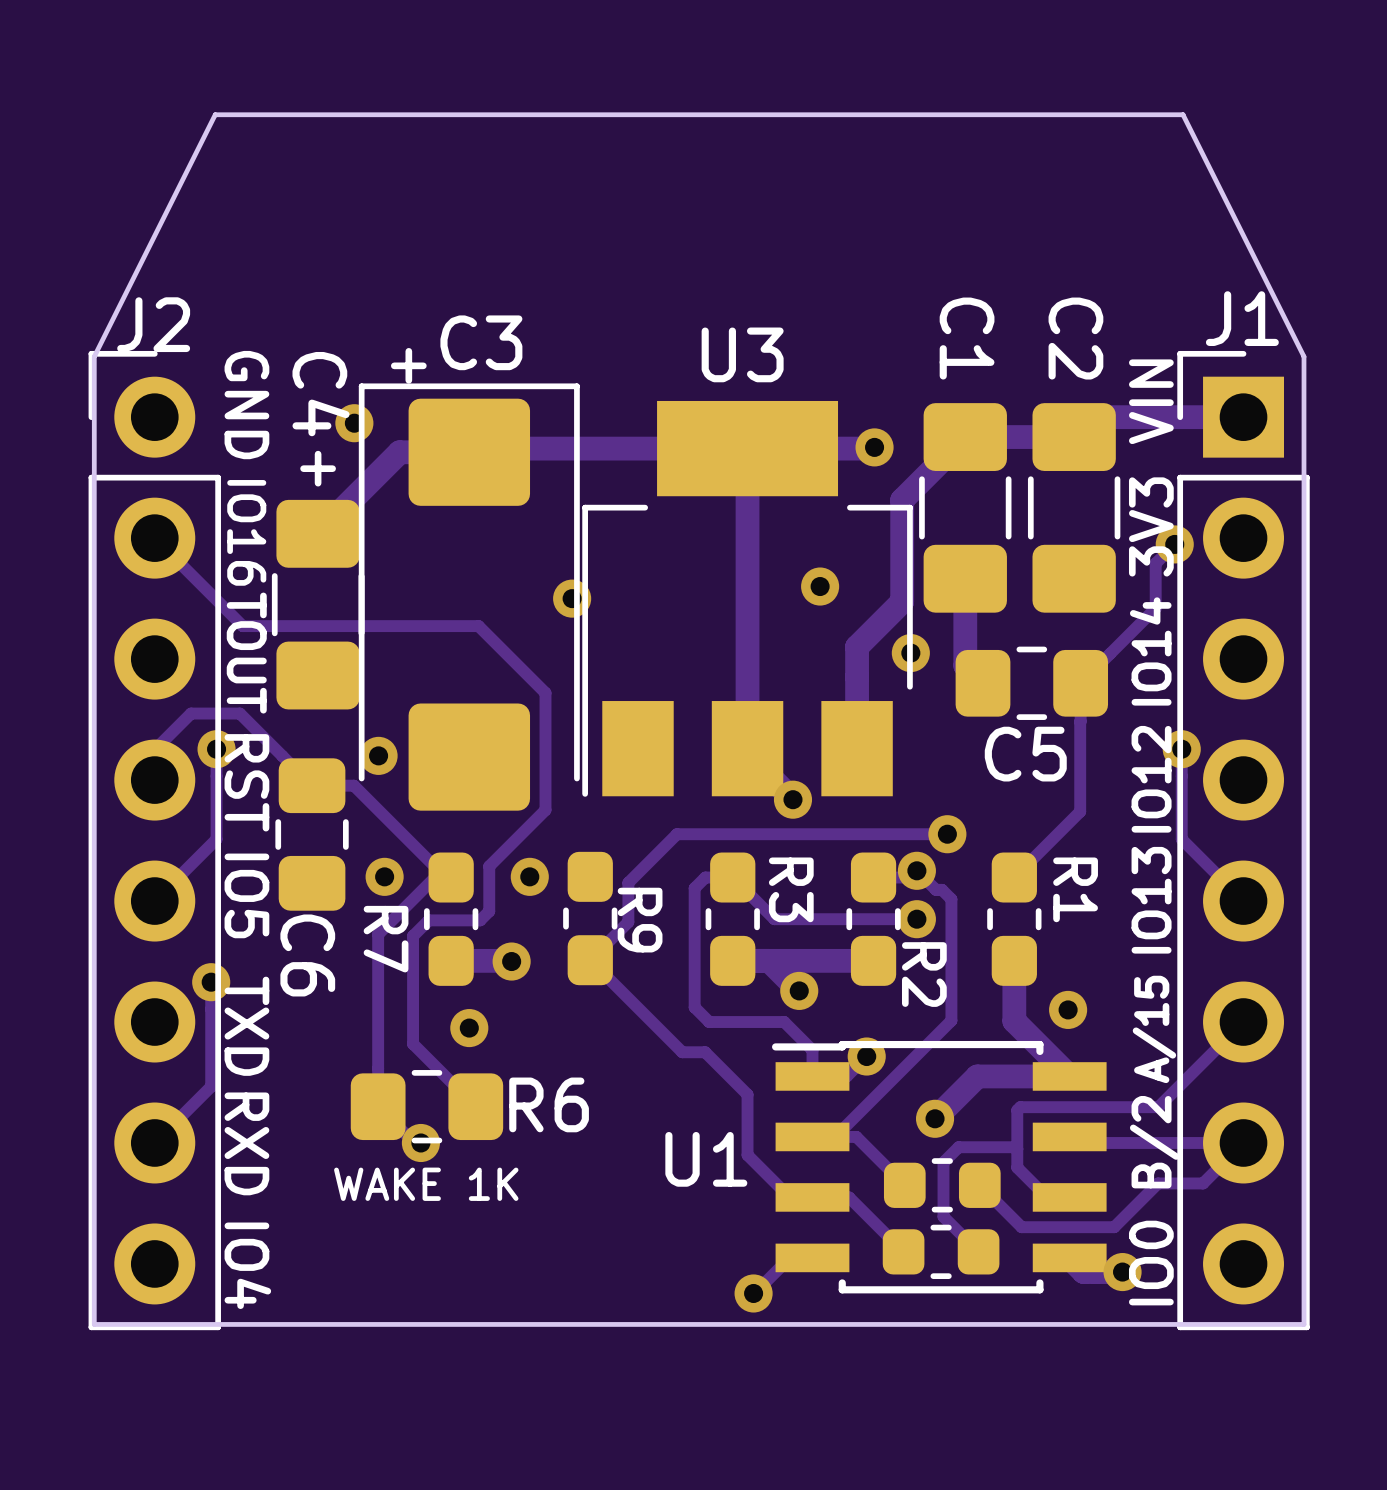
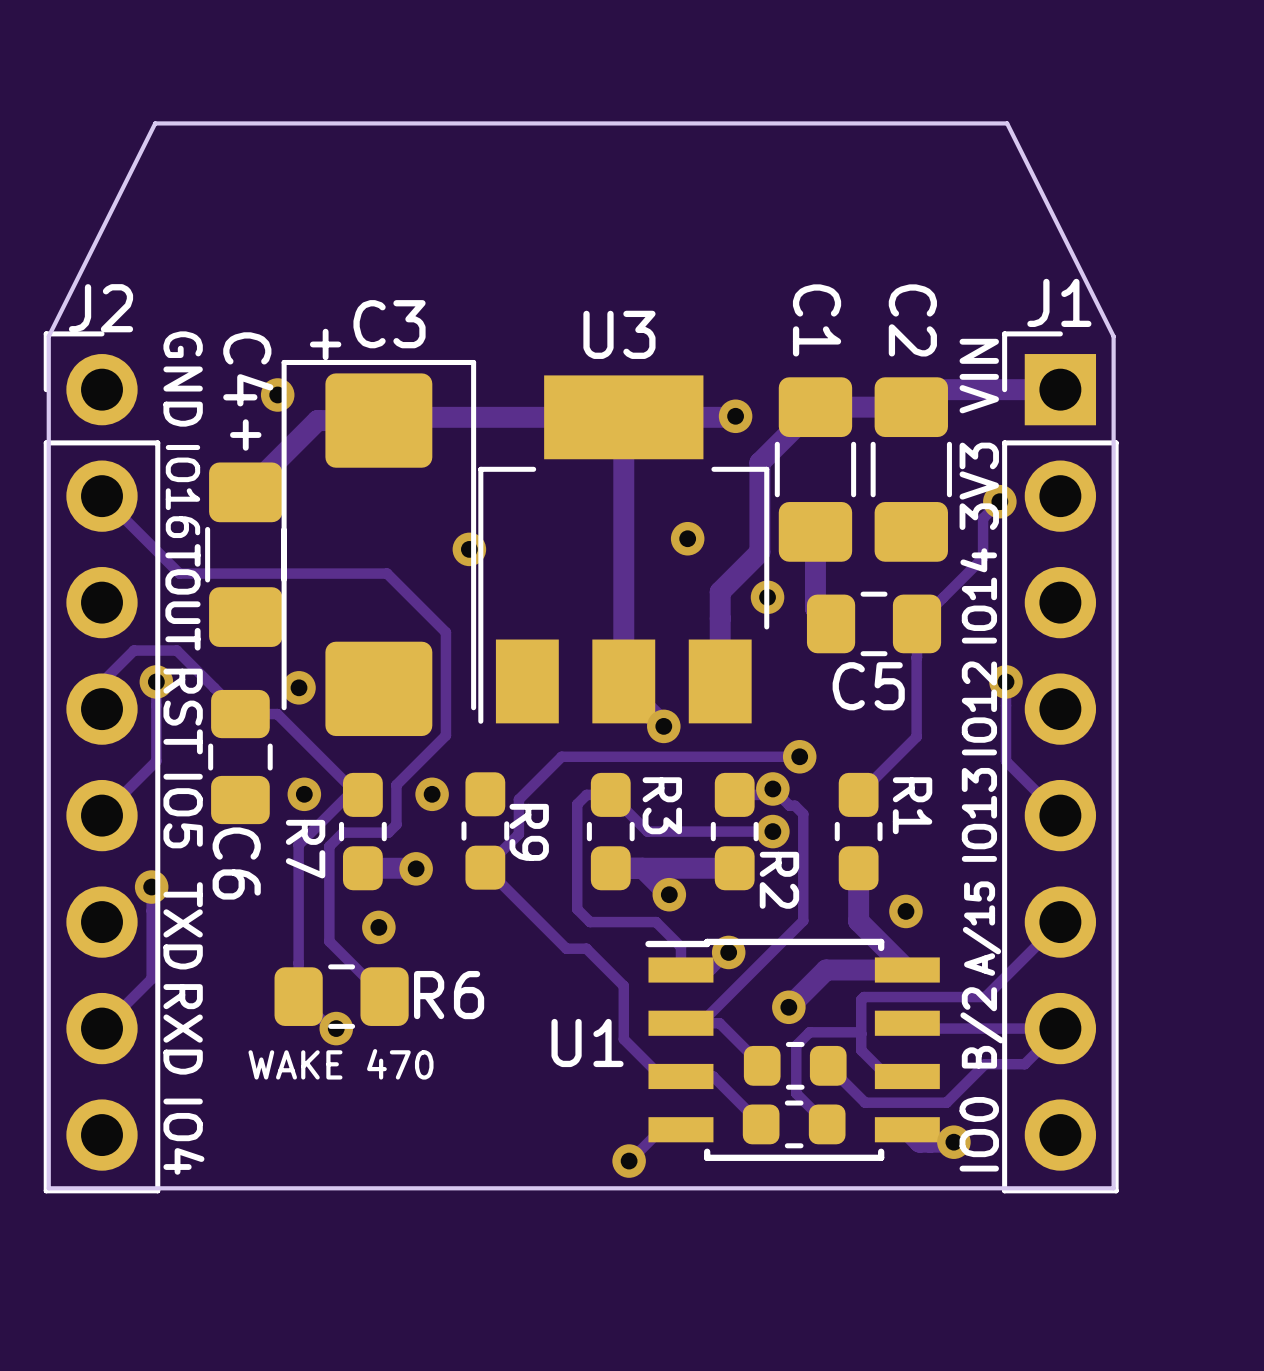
text: WAKE 1K (426, 1184) -> WAKE 470 (341, 1064)

